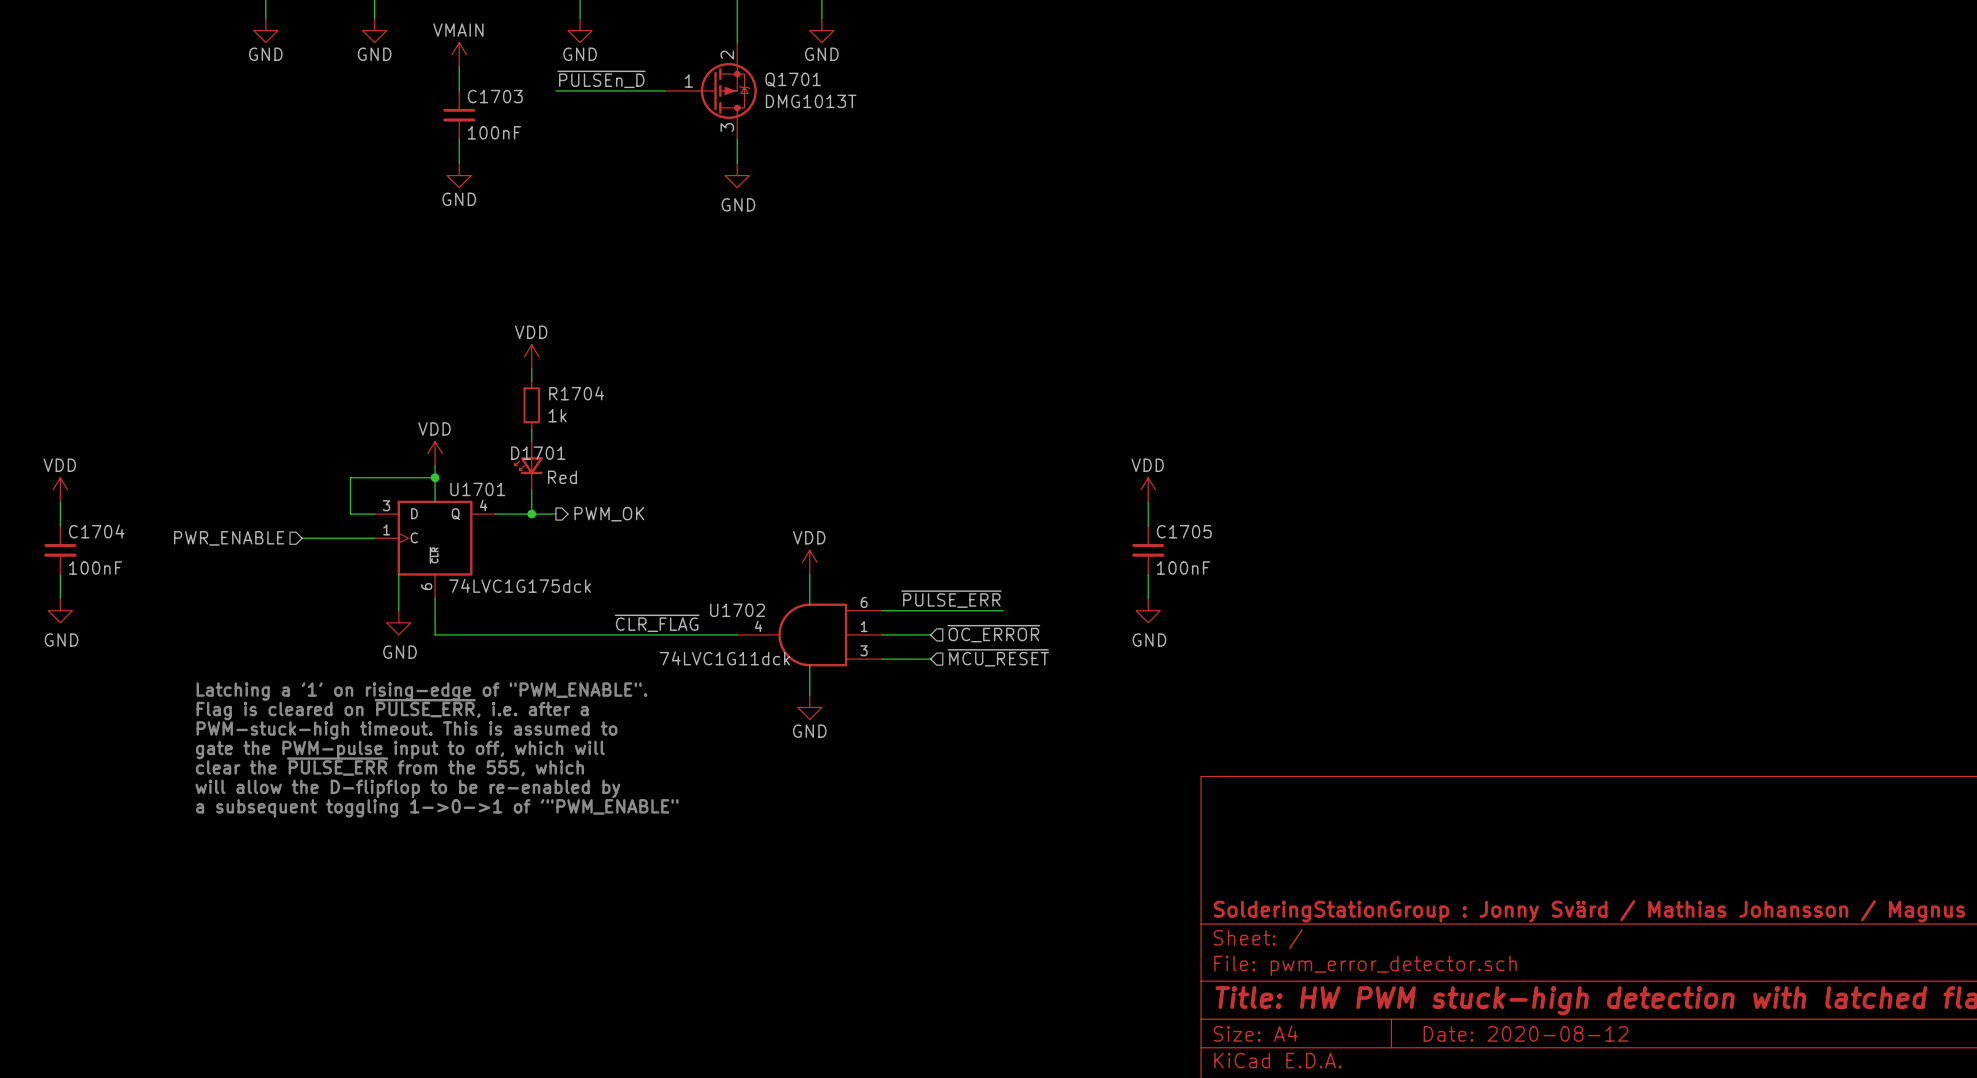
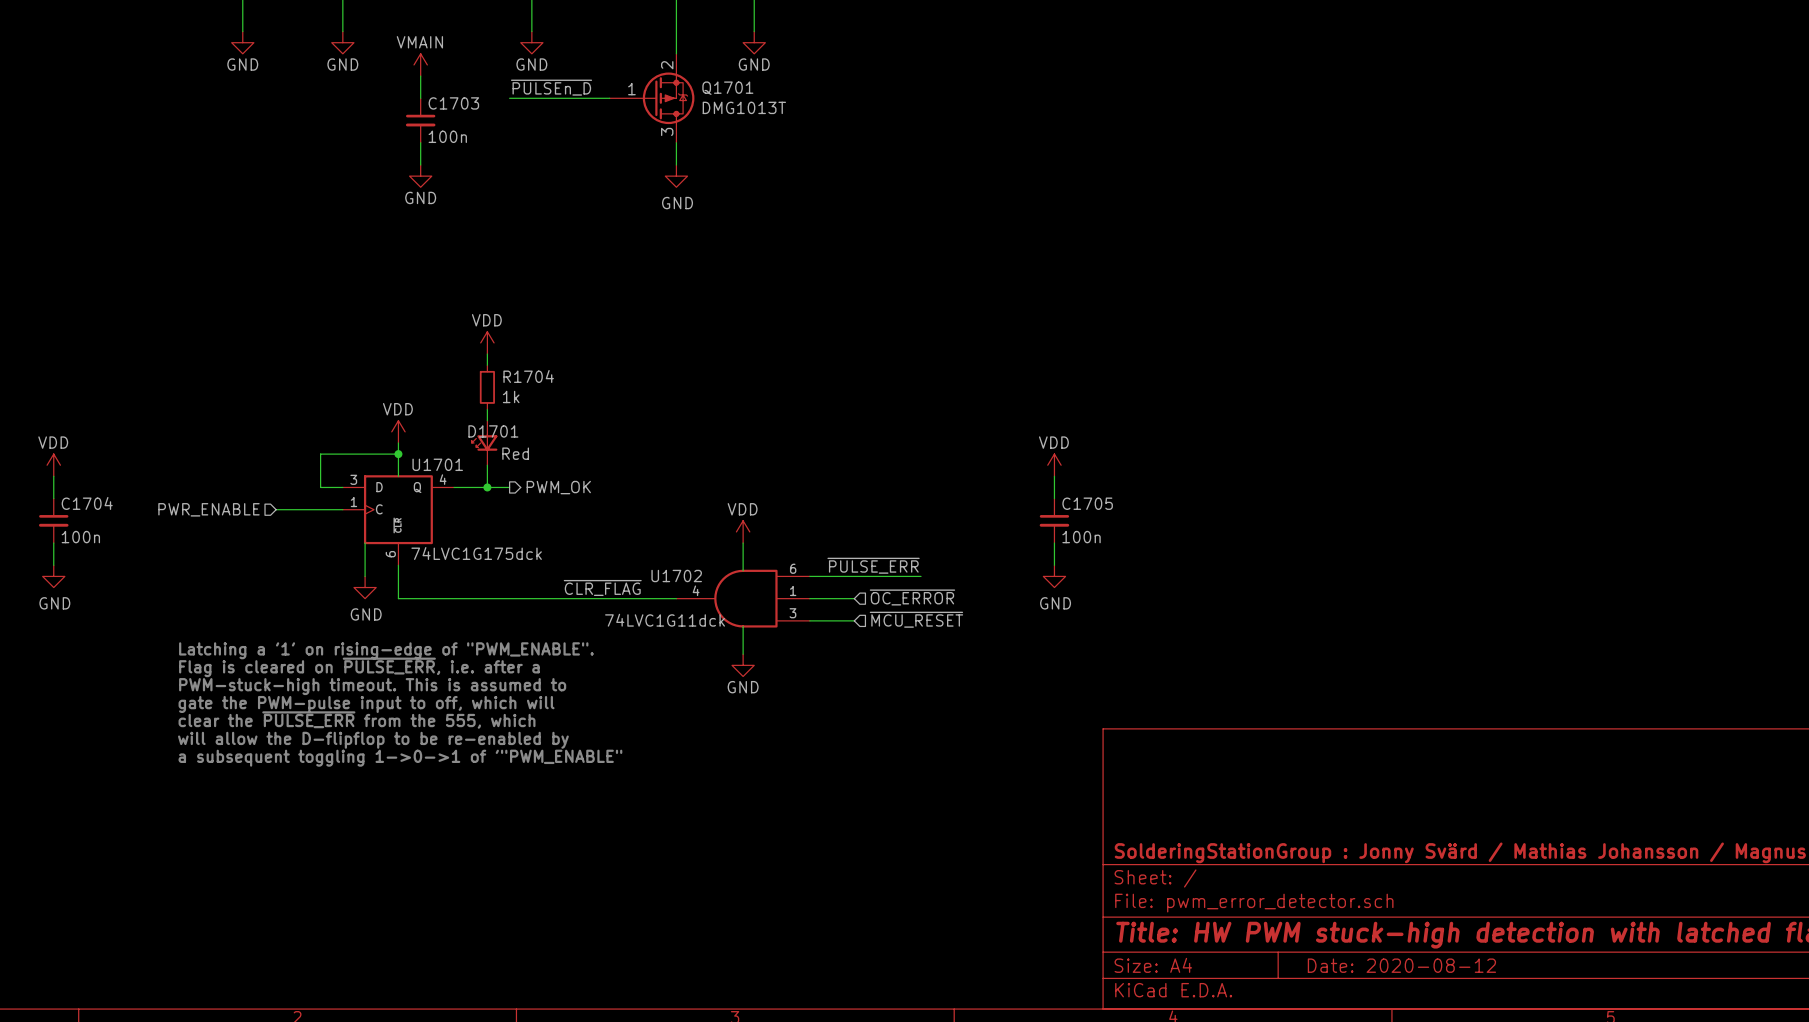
C1703 value: 100nF (494, 132) -> 100n (447, 136)
C1704 value: 100nF (95, 567) -> 100n (80, 537)
C1705 value: 100nF (1183, 567) -> 100n (1081, 537)

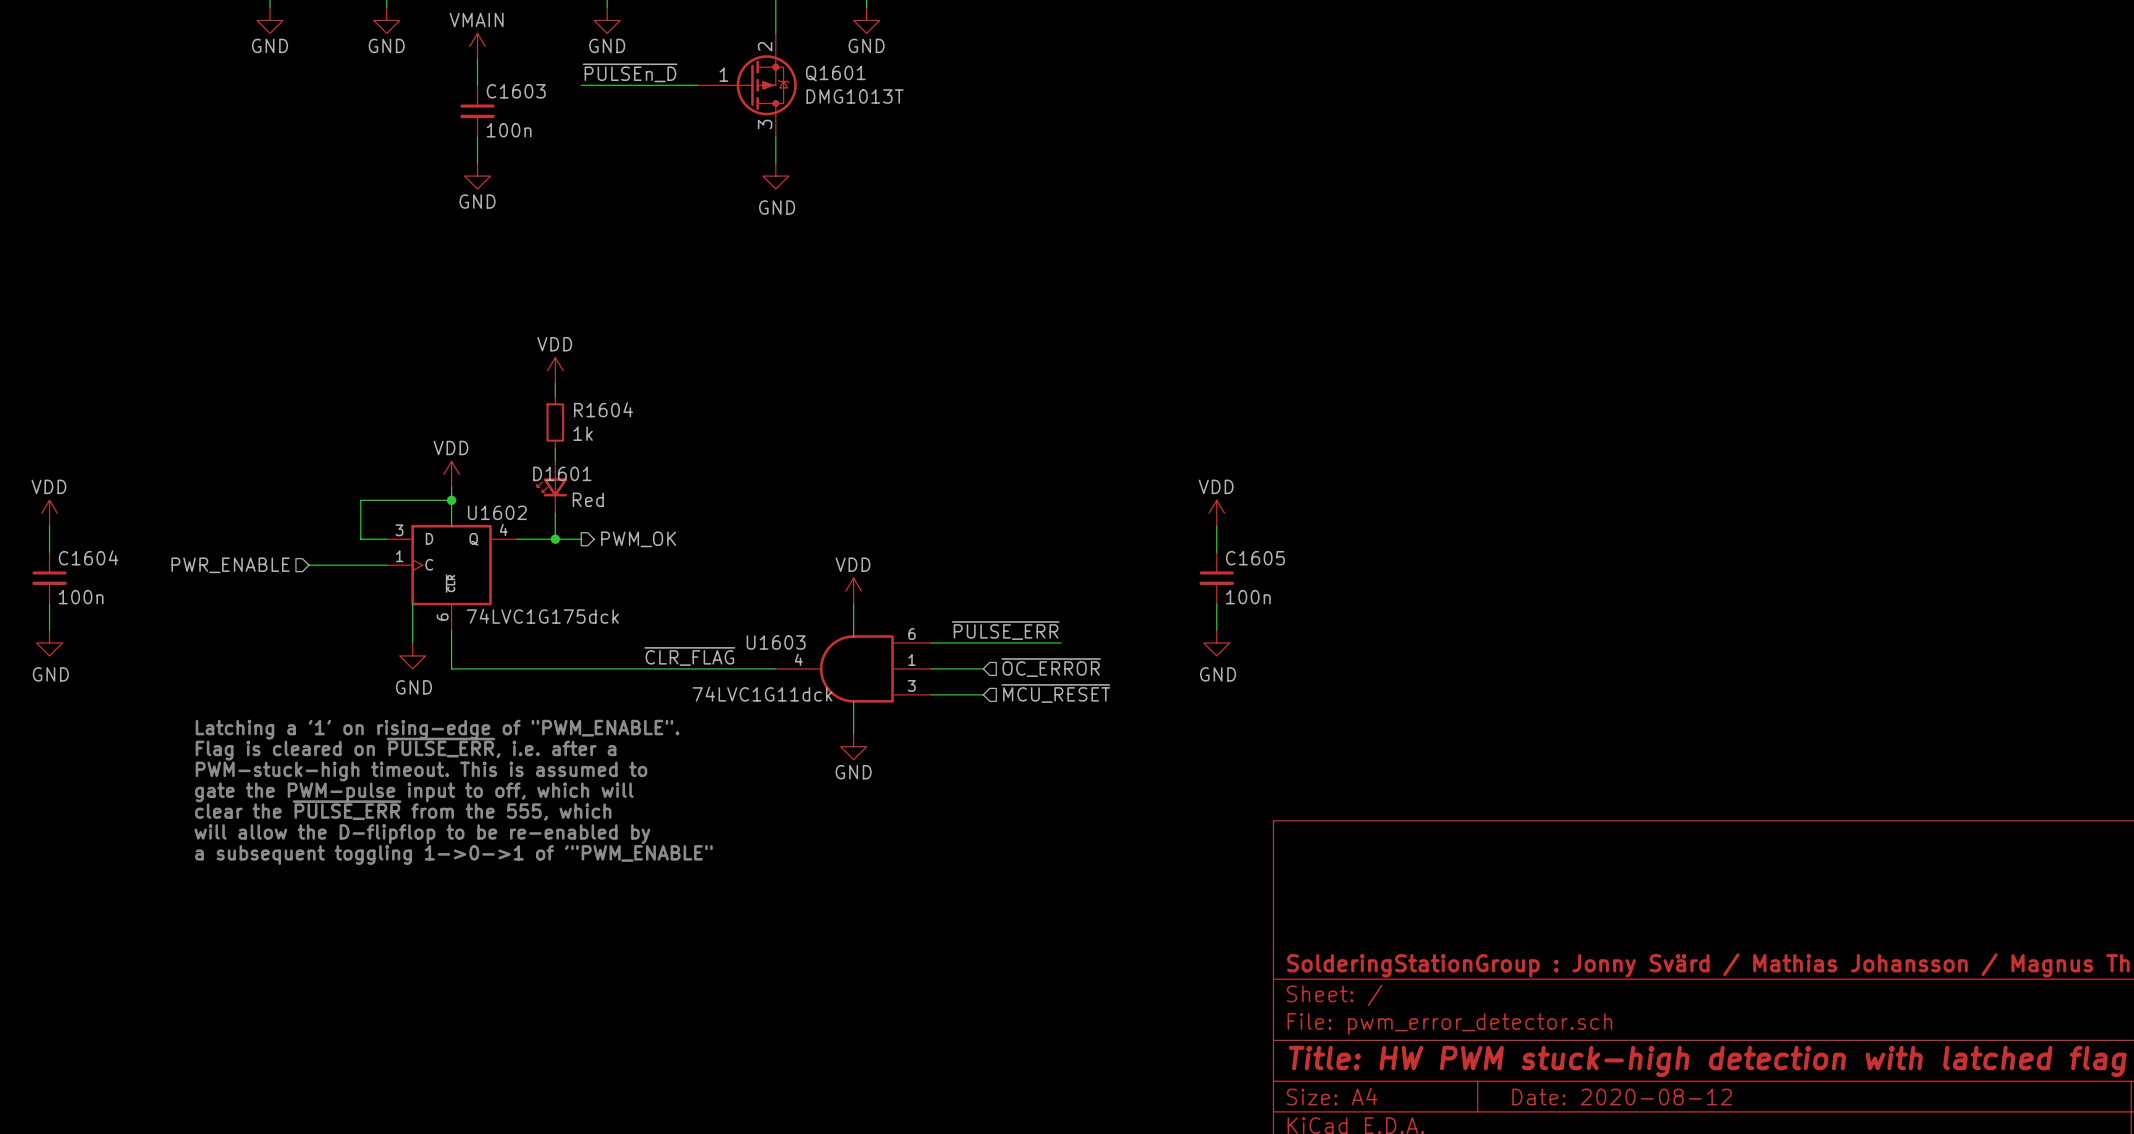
Q1701 name: Q1701 (727, 88) -> Q1601 (835, 73)
C1703 name: C1703 (453, 103) -> C1603 (516, 91)
R1704 name: R1704 (528, 376) -> R1604 (603, 409)
D1701 name: D1701 (493, 431) -> D1601 (562, 473)
U1701 name: U1701 (437, 464) -> U1602 (497, 512)
C1704 name: C1704 (87, 503) -> C1604 (88, 557)
C1705 name: C1705 (1087, 503) -> C1605 (1255, 558)
U1702 name: U1702 (676, 575) -> U1603 (776, 642)

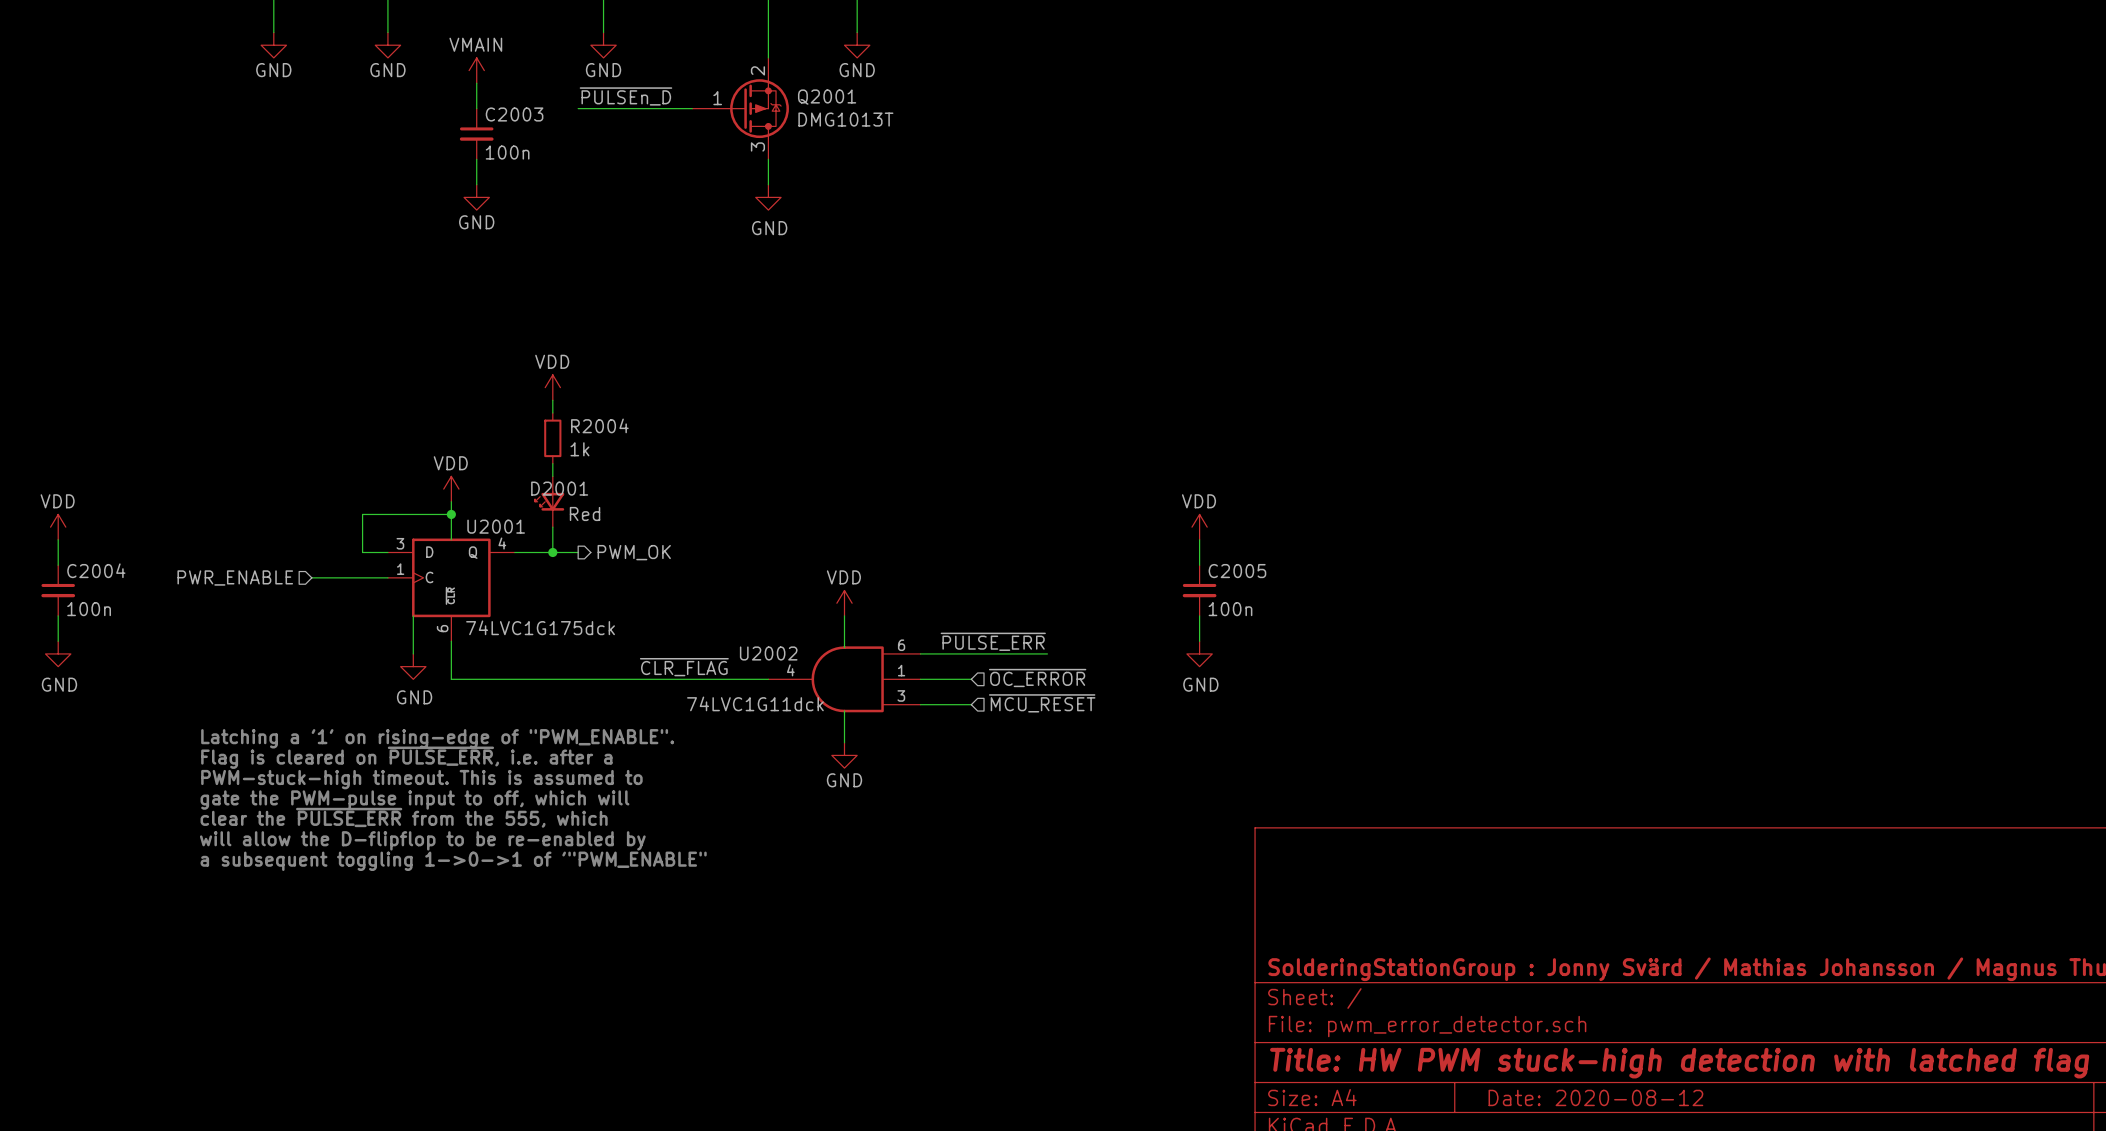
Q1601 name: Q1601 (835, 73) -> Q2001 (827, 97)
C1603 name: C1603 (516, 91) -> C2003 (514, 114)
R1604 name: R1604 (603, 409) -> R2004 (599, 425)
D1601 name: D1601 (562, 473) -> D2001 (559, 488)
U1602 name: U1602 (497, 512) -> U2001 (496, 526)
C1604 name: C1604 (88, 557) -> C2004 (96, 570)
C1605 name: C1605 (1255, 558) -> C2005 (1237, 571)
U1603 name: U1603 (776, 642) -> U2002 (768, 653)

